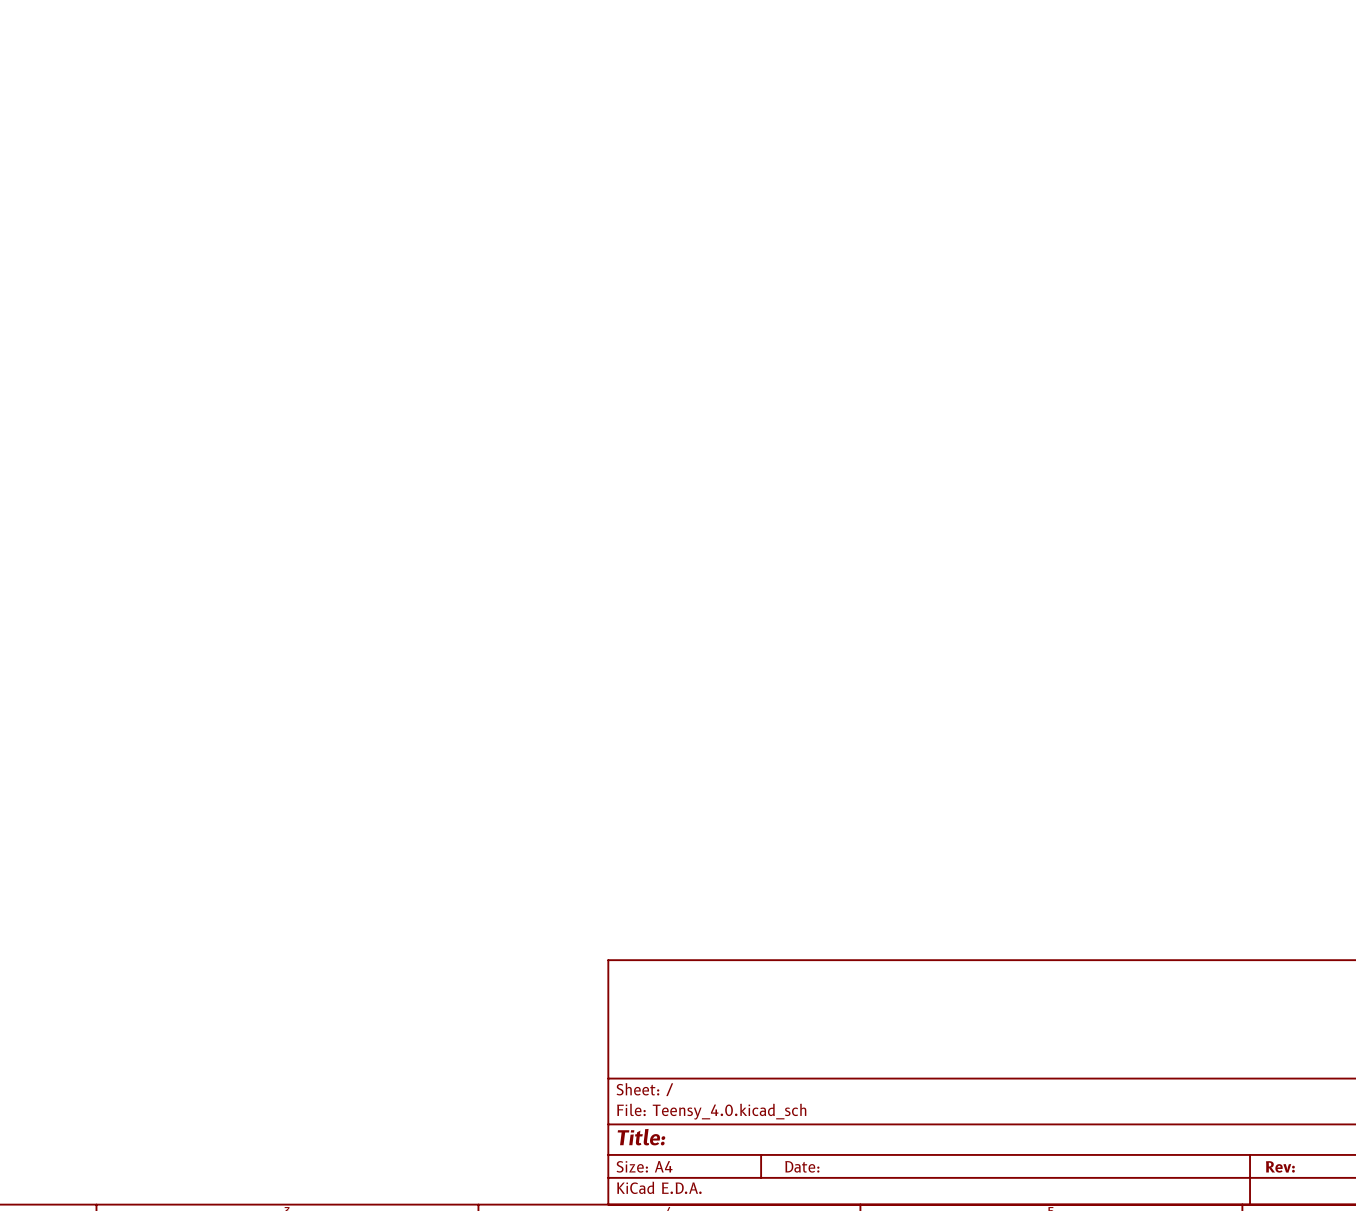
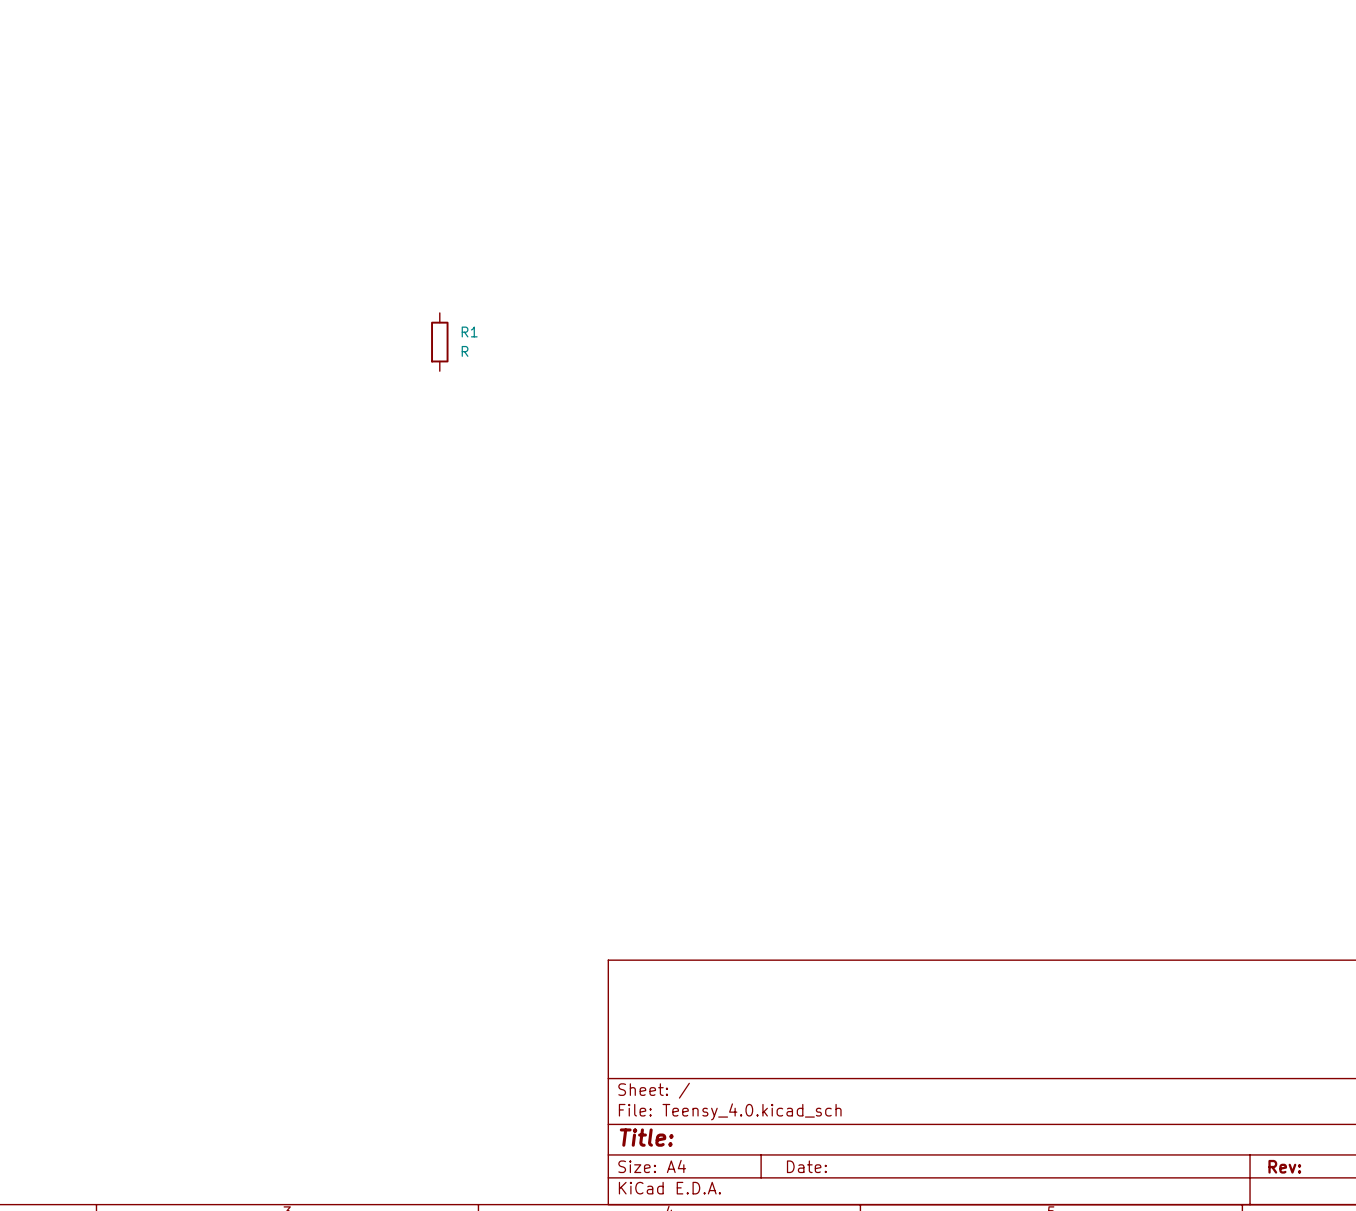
R1: none -> R (439, 342)

